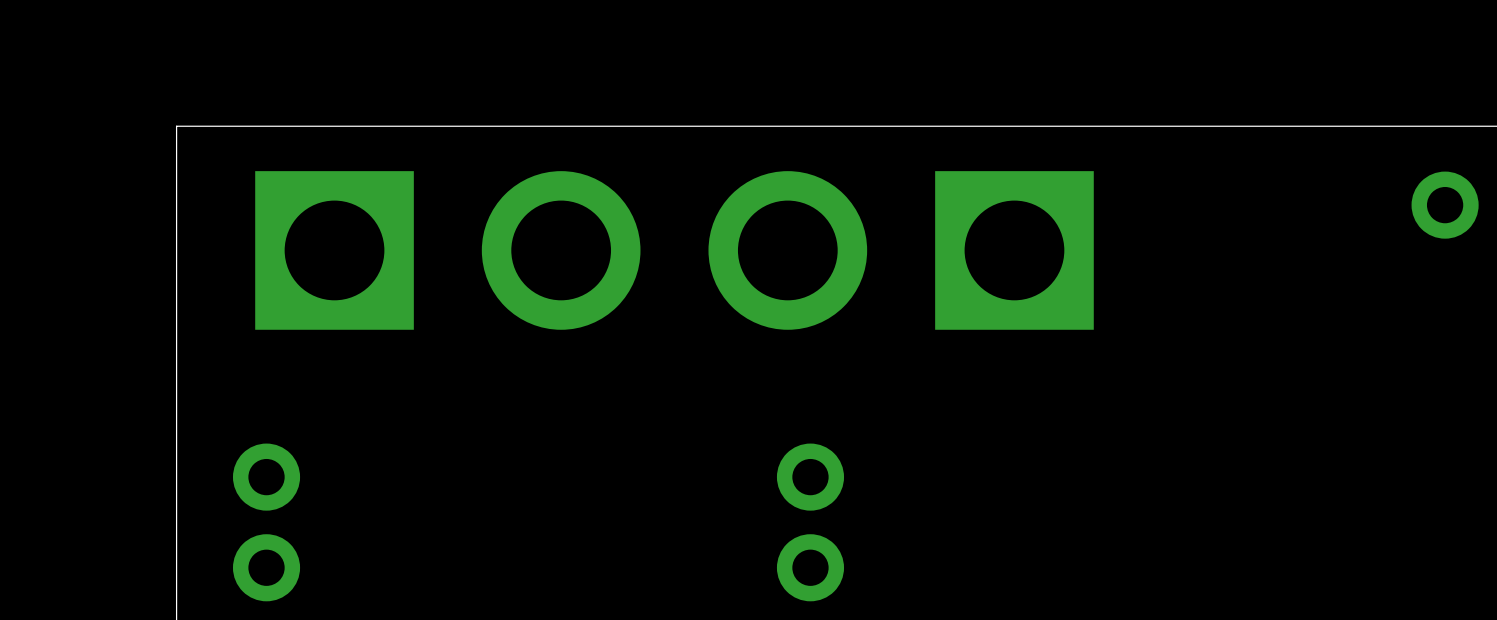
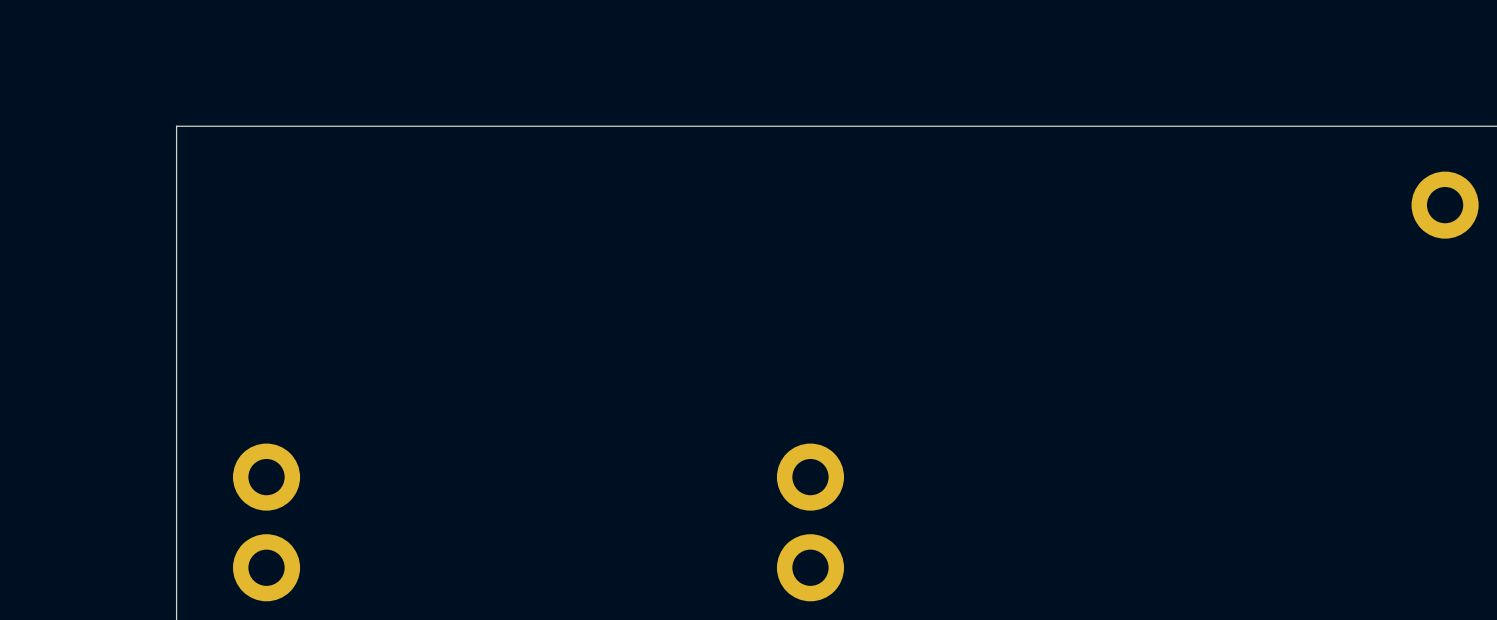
part: (447, 250) -> none
part: (901, 250) -> none

